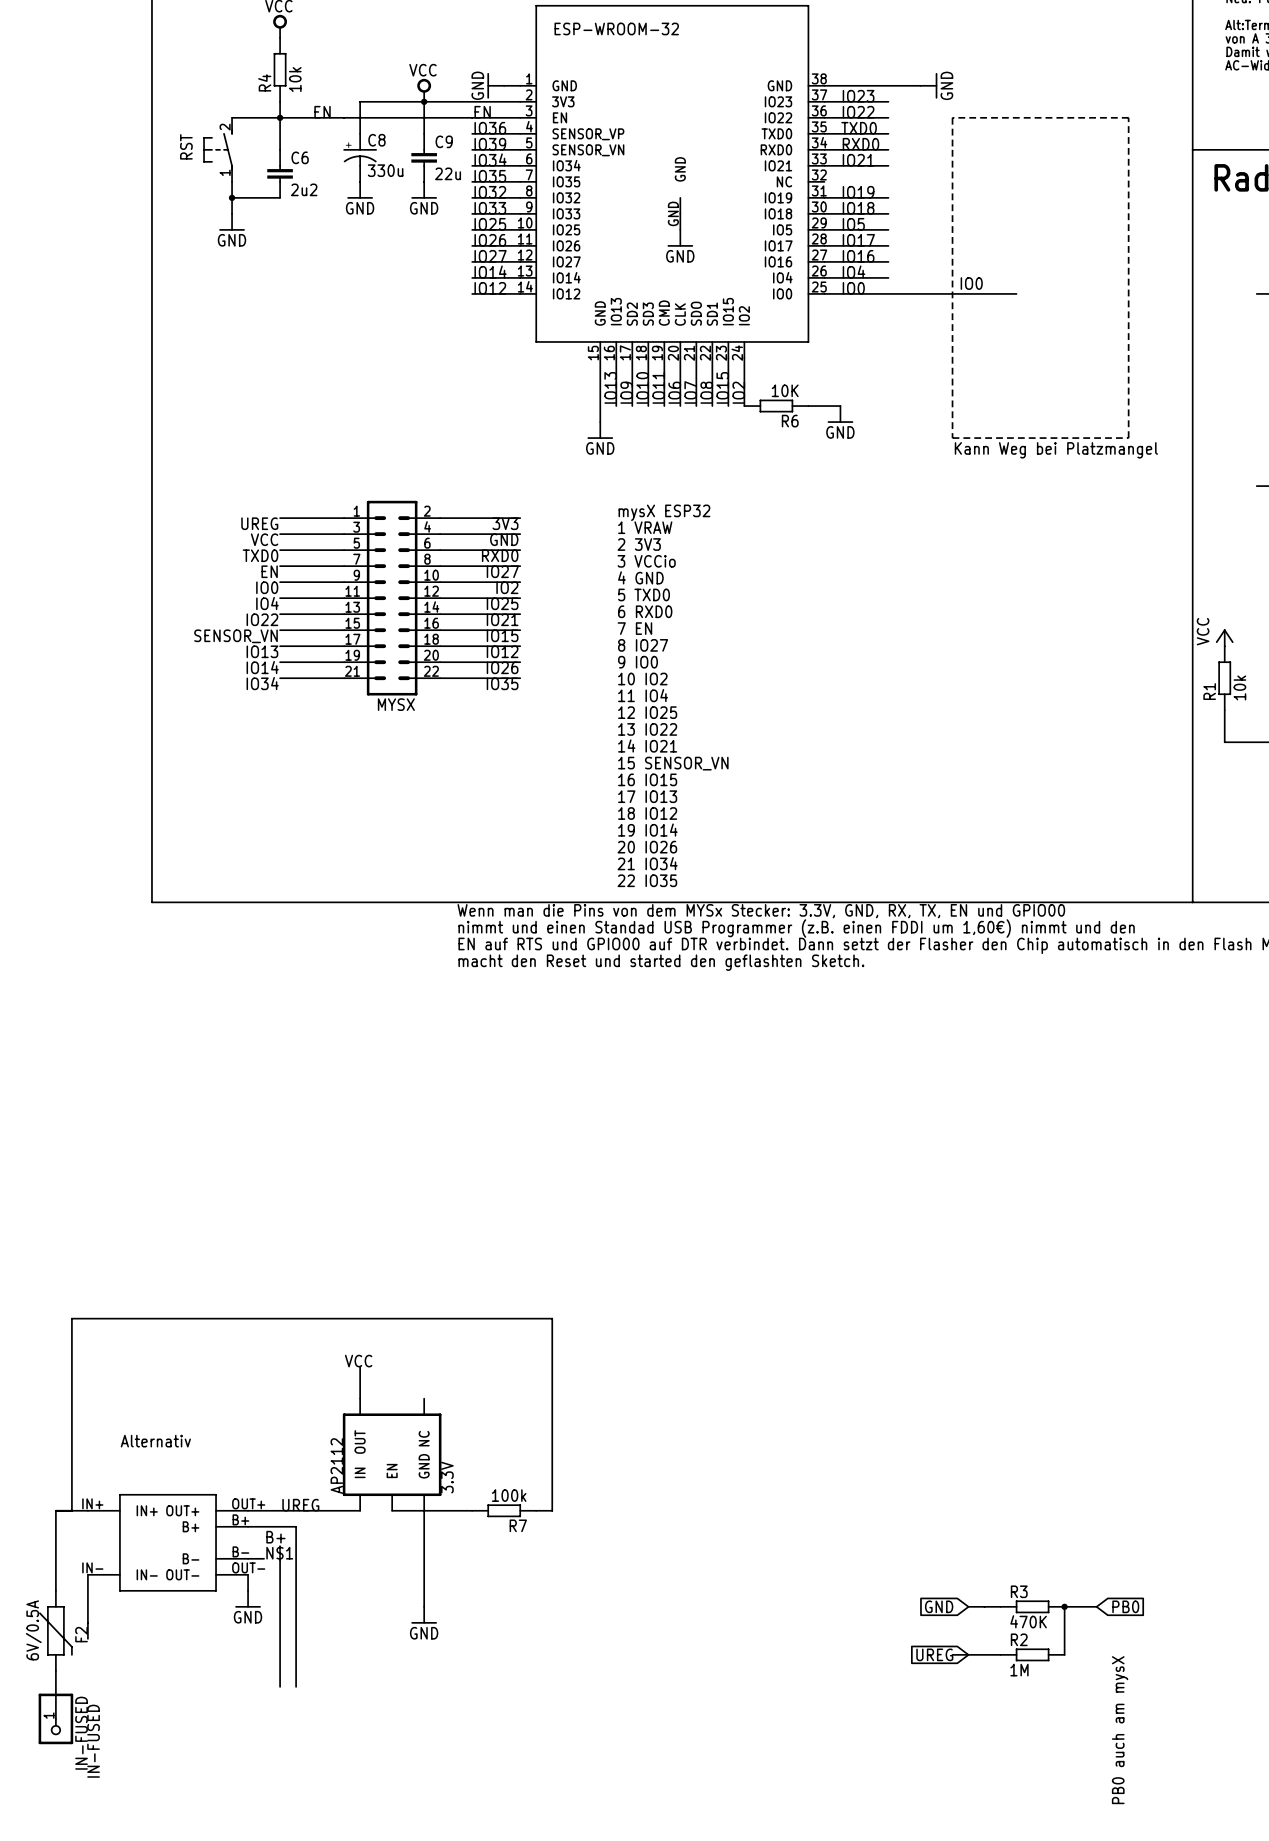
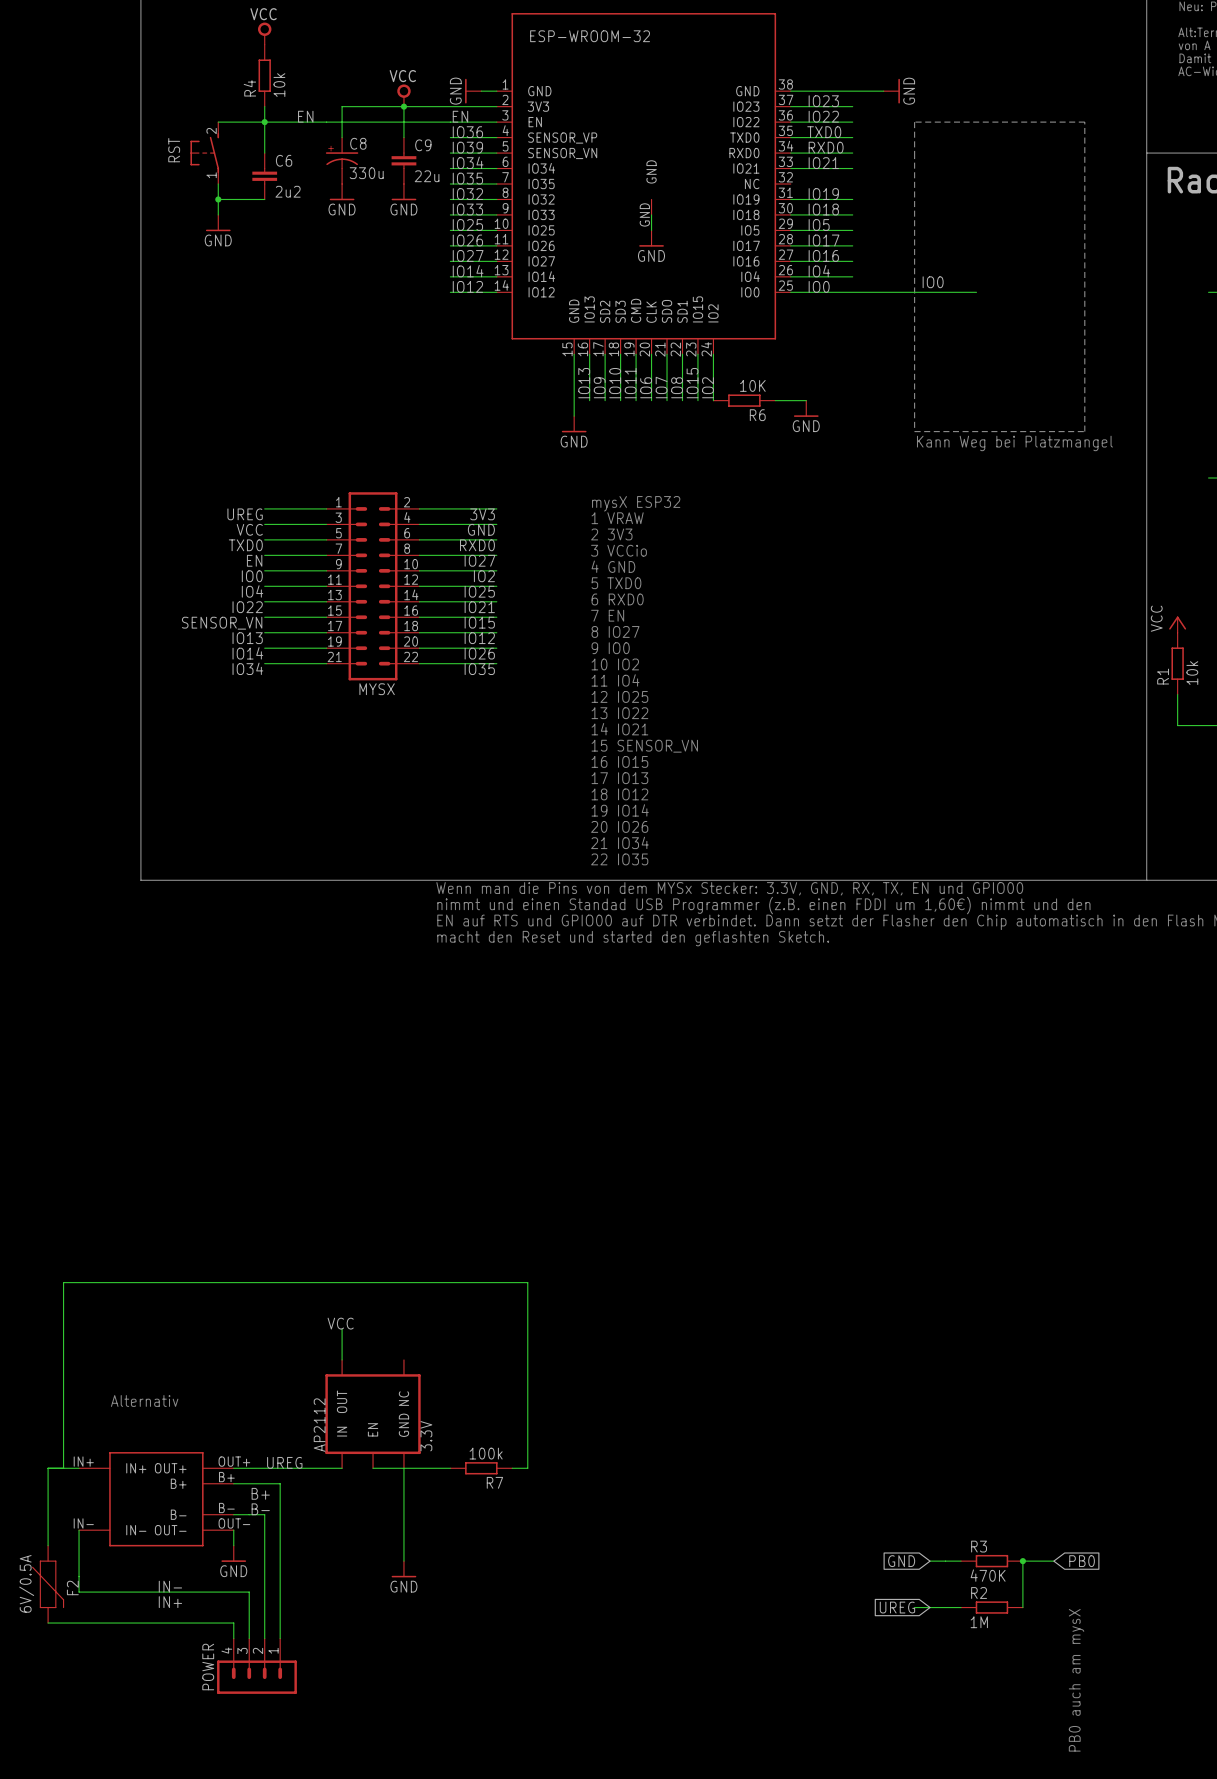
label: N$1 (279, 1553) -> B- (260, 1509)
wire: none -> (249, 1514) (264, 1514)
label: none -> IN- (170, 1586)
wire: none -> (79, 1592) (249, 1592) (249, 1638)
label: none -> IN+ (170, 1602)
wire: (55, 1670) (55, 1718) -> (48, 1623) (233, 1623) (233, 1638)
POWER: none -> (256, 1666)
IN-FUSED: (55, 1718) -> none
label: IN-FUSED (93, 1741) -> none

